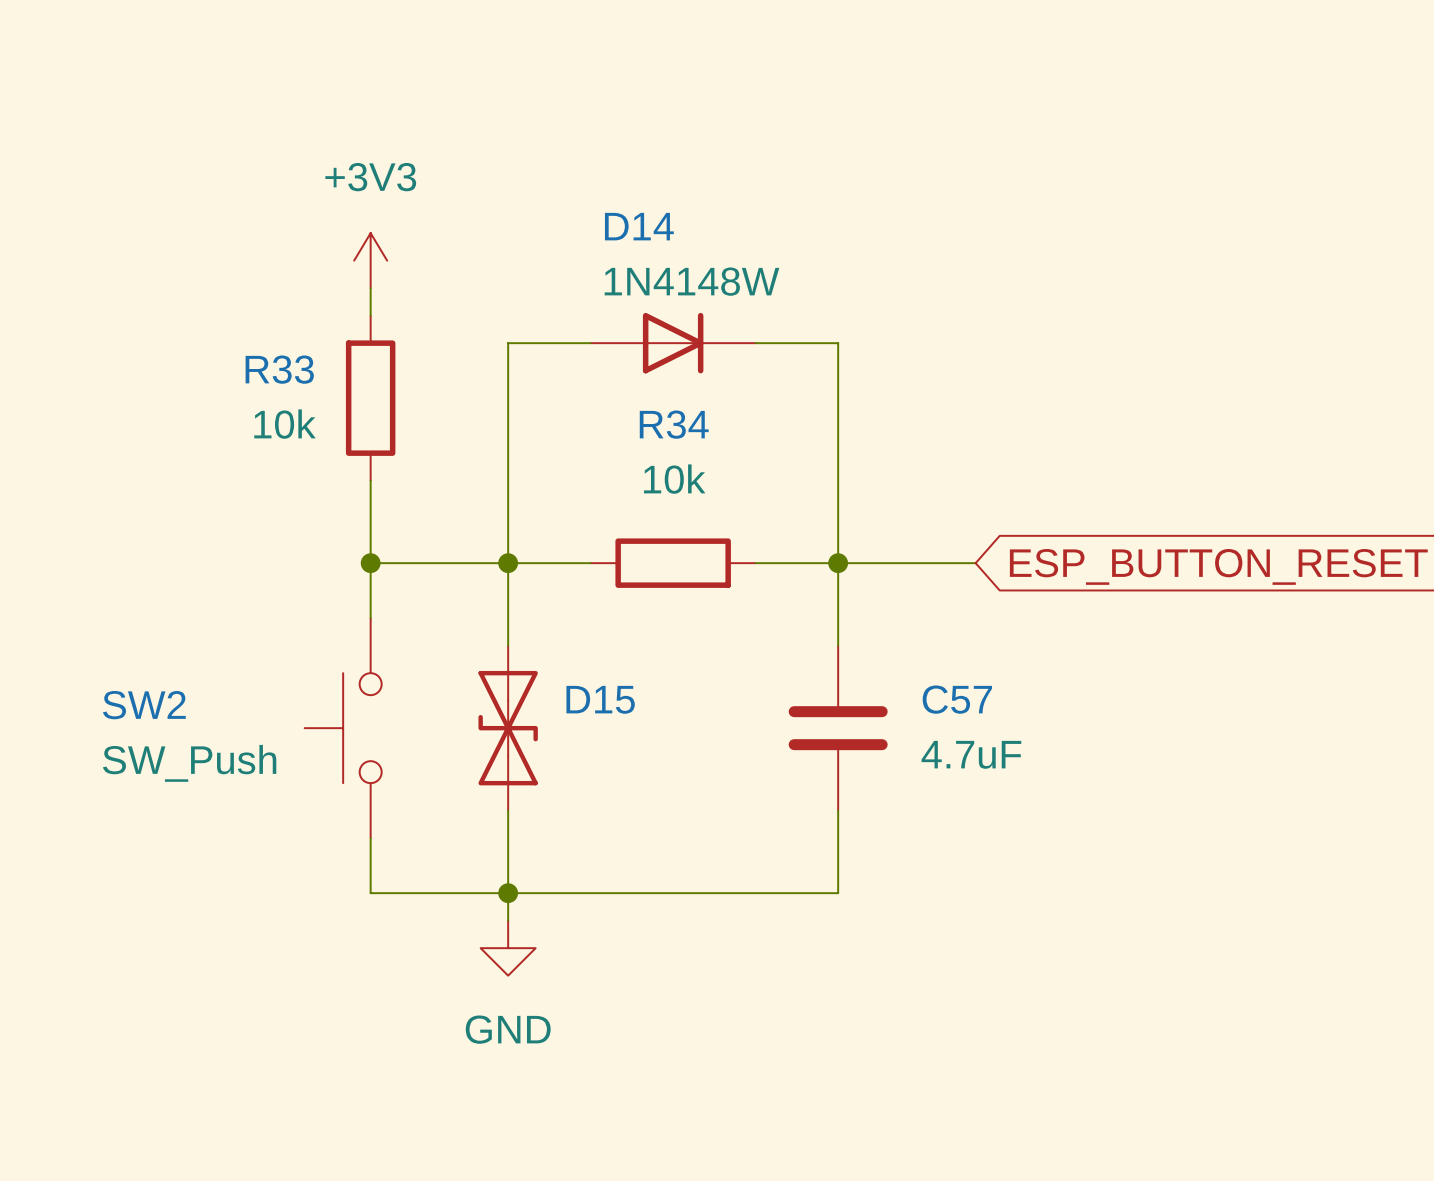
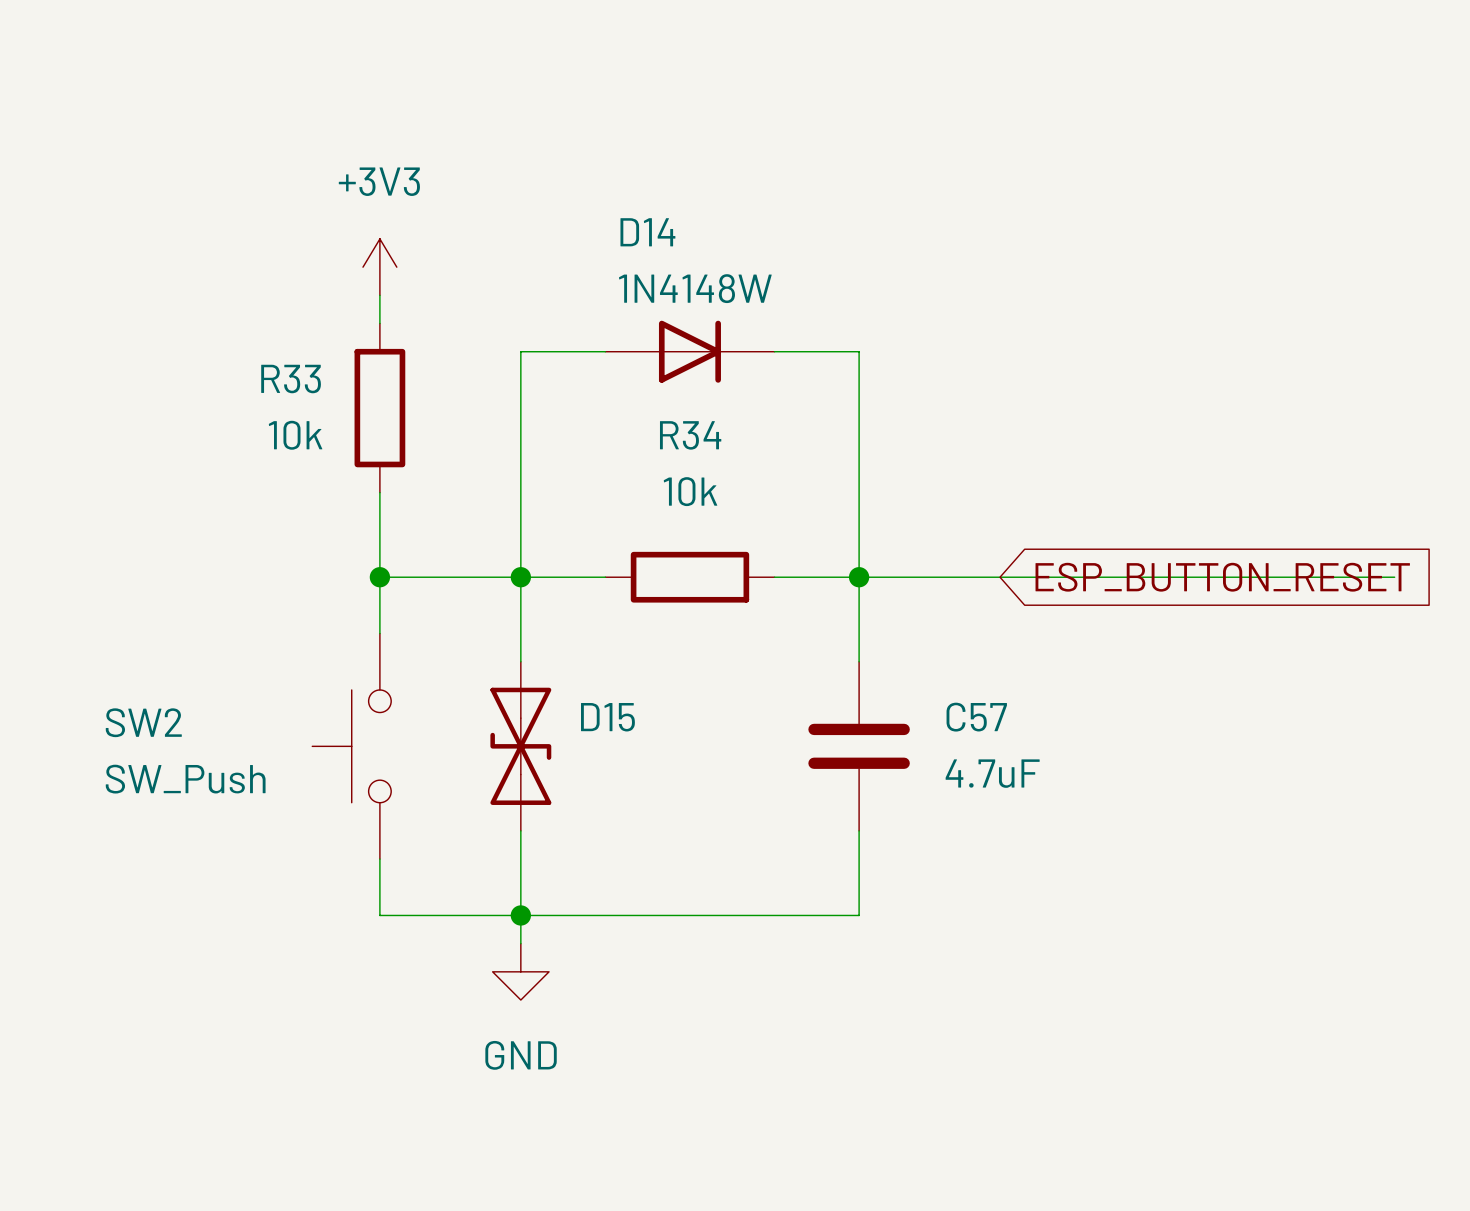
wire: none -> (1000, 577) (1394, 577)

